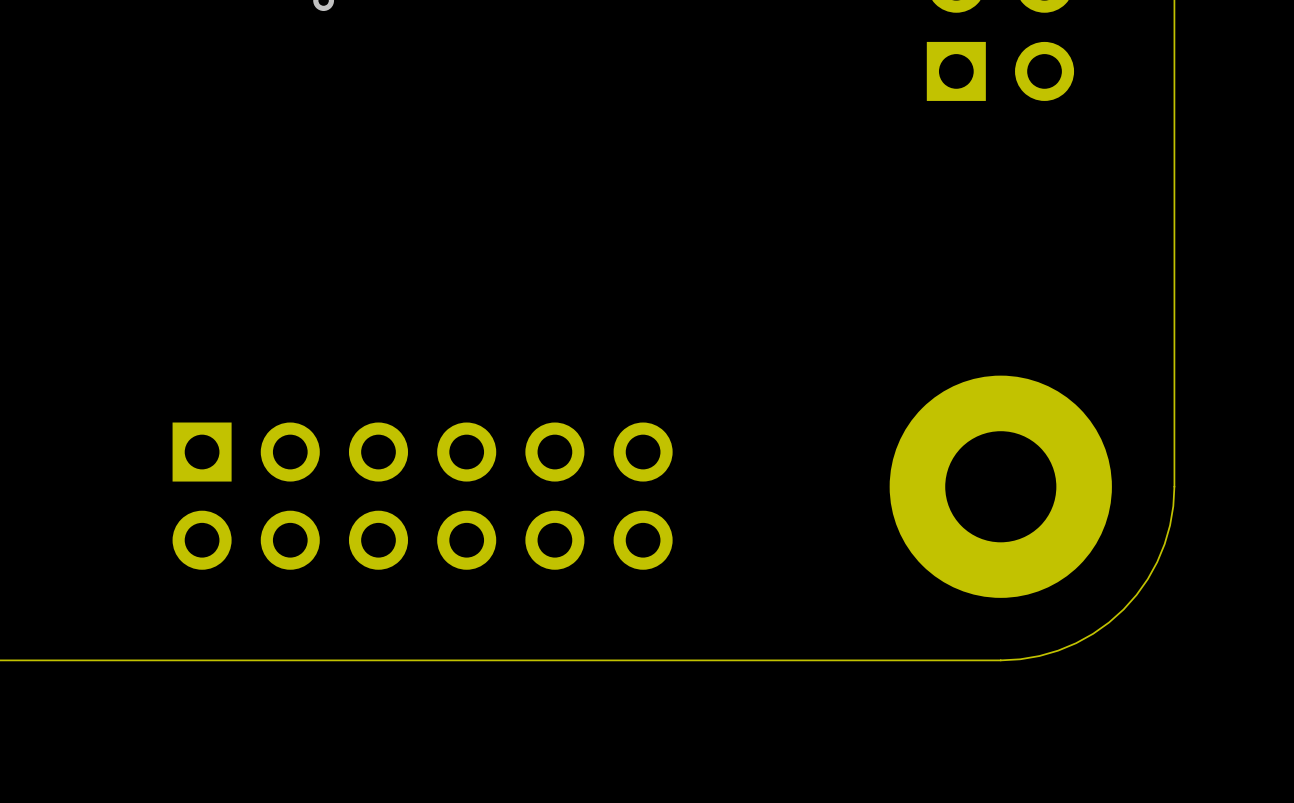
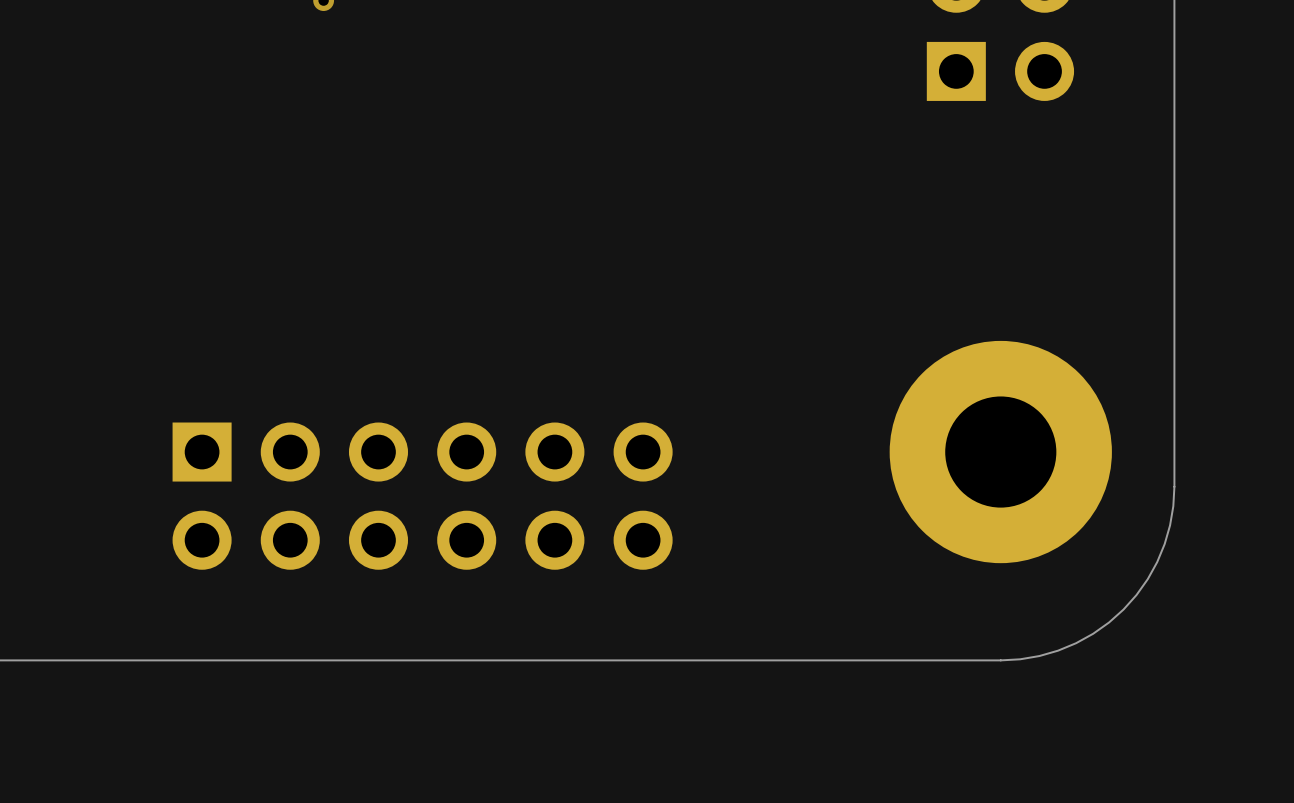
part position: (1000, 486) -> (1000, 452)

